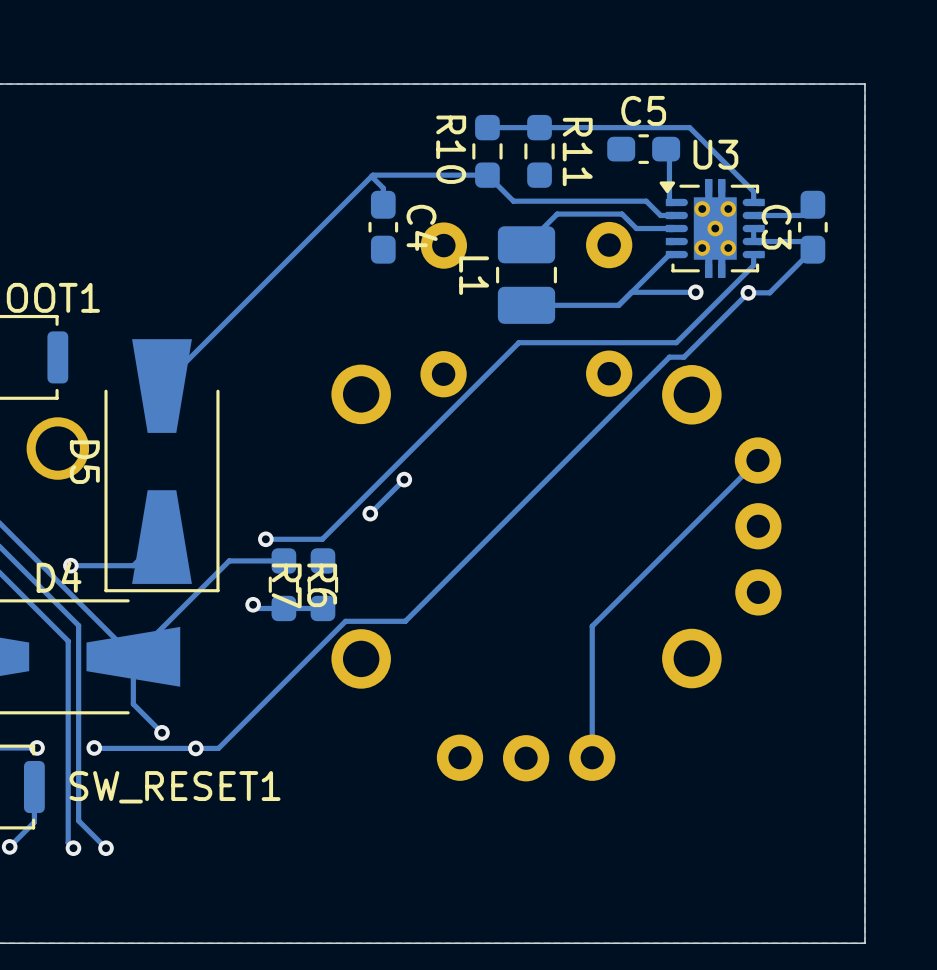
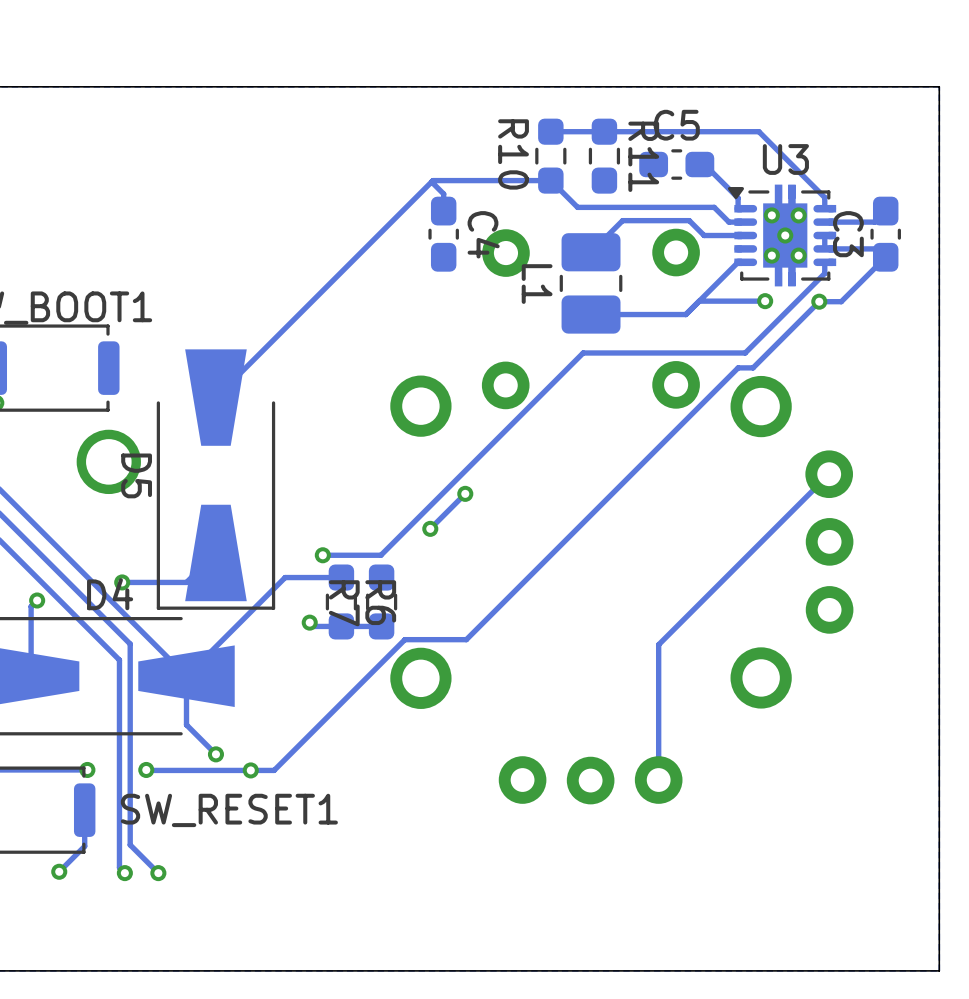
C5 position: (643, 149) -> (676, 164)
track: (666, 149) (669, 152) (669, 192) -> (704, 164) (738, 198)

